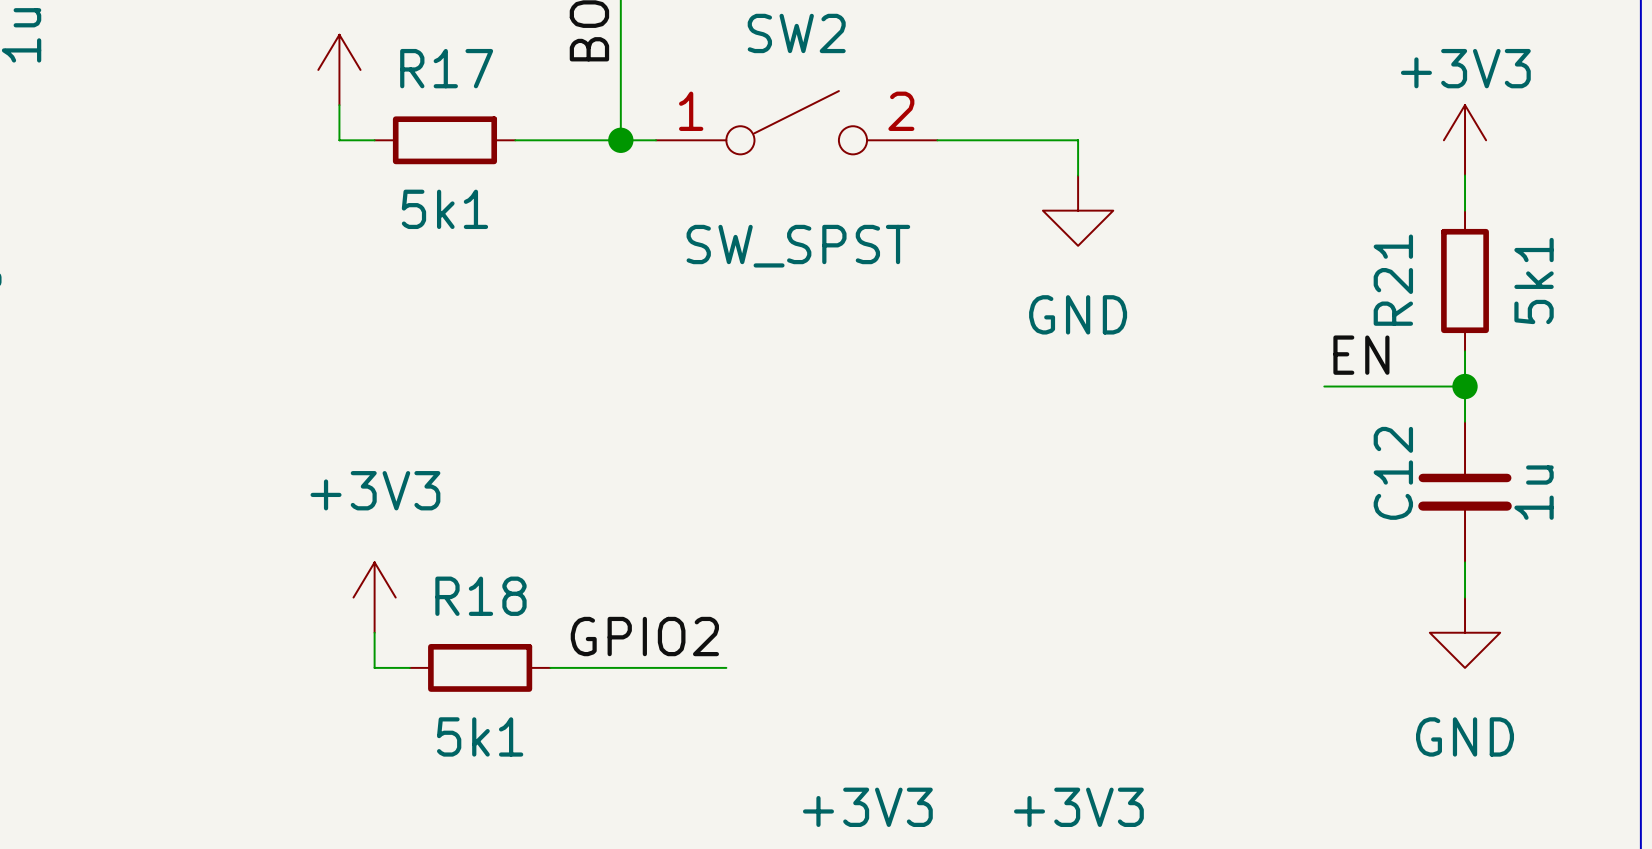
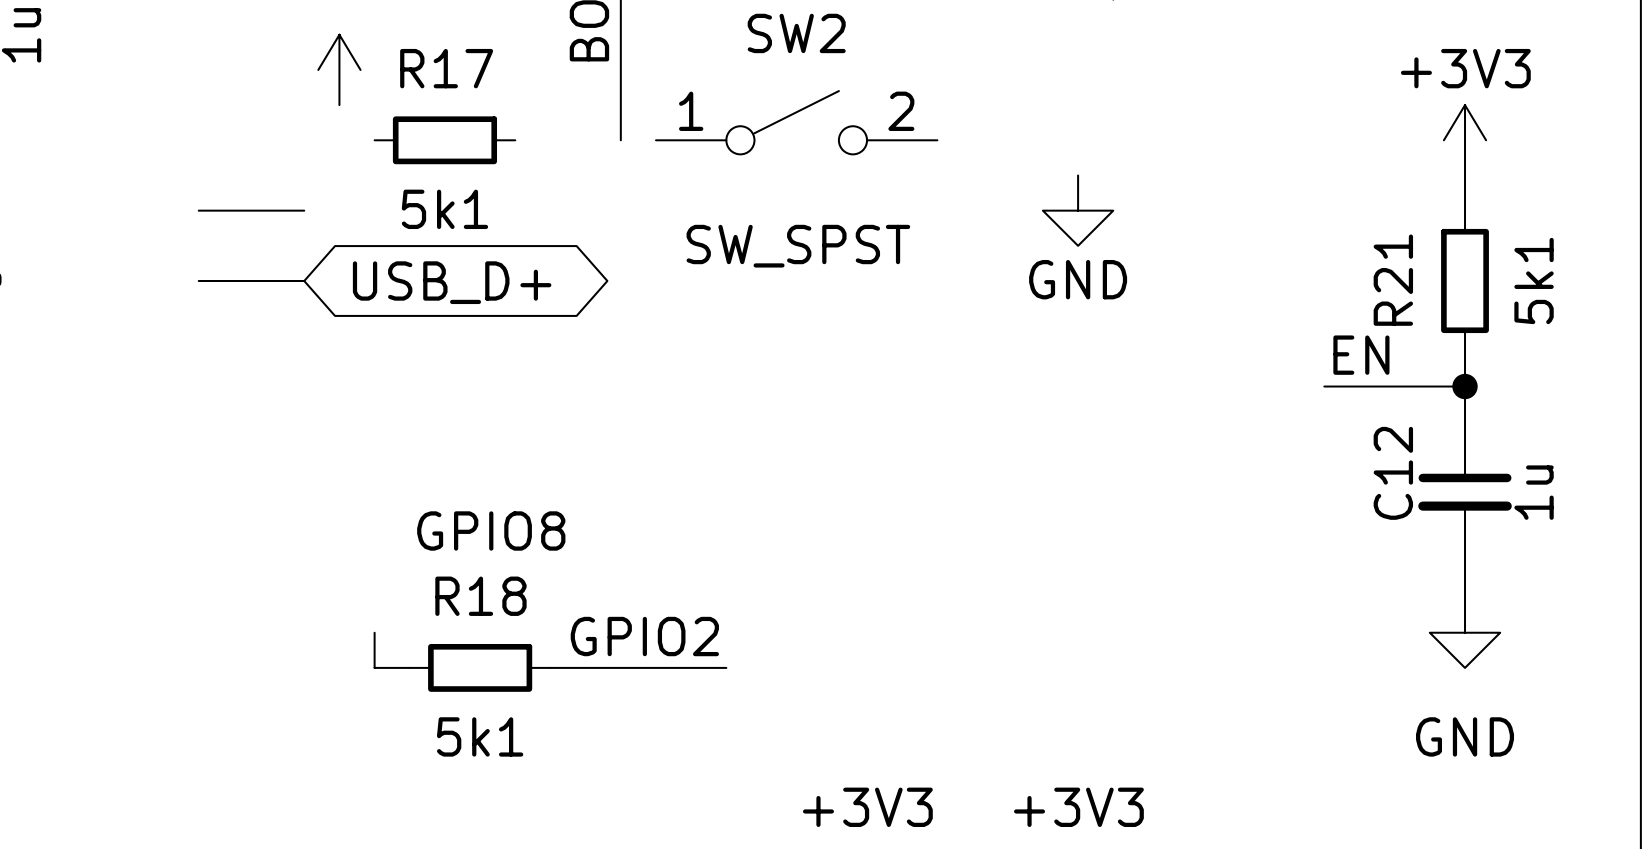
wire: (339, 105) (339, 140) (374, 140) -> none
wire: (515, 140) (656, 140) -> none
junction: (620, 140) -> none
wire: (937, 140) (1078, 140) (1078, 175) -> none
wire: none -> (198, 210) (304, 210)
wire: none -> (198, 280) (304, 280)
global label: none -> USB_D+ (452, 282)
power symbol text position: GND (1078, 314) -> GND (1078, 279)
label: none -> GPIO8 (491, 531)
power symbol: +3V3 (374, 597) -> none

